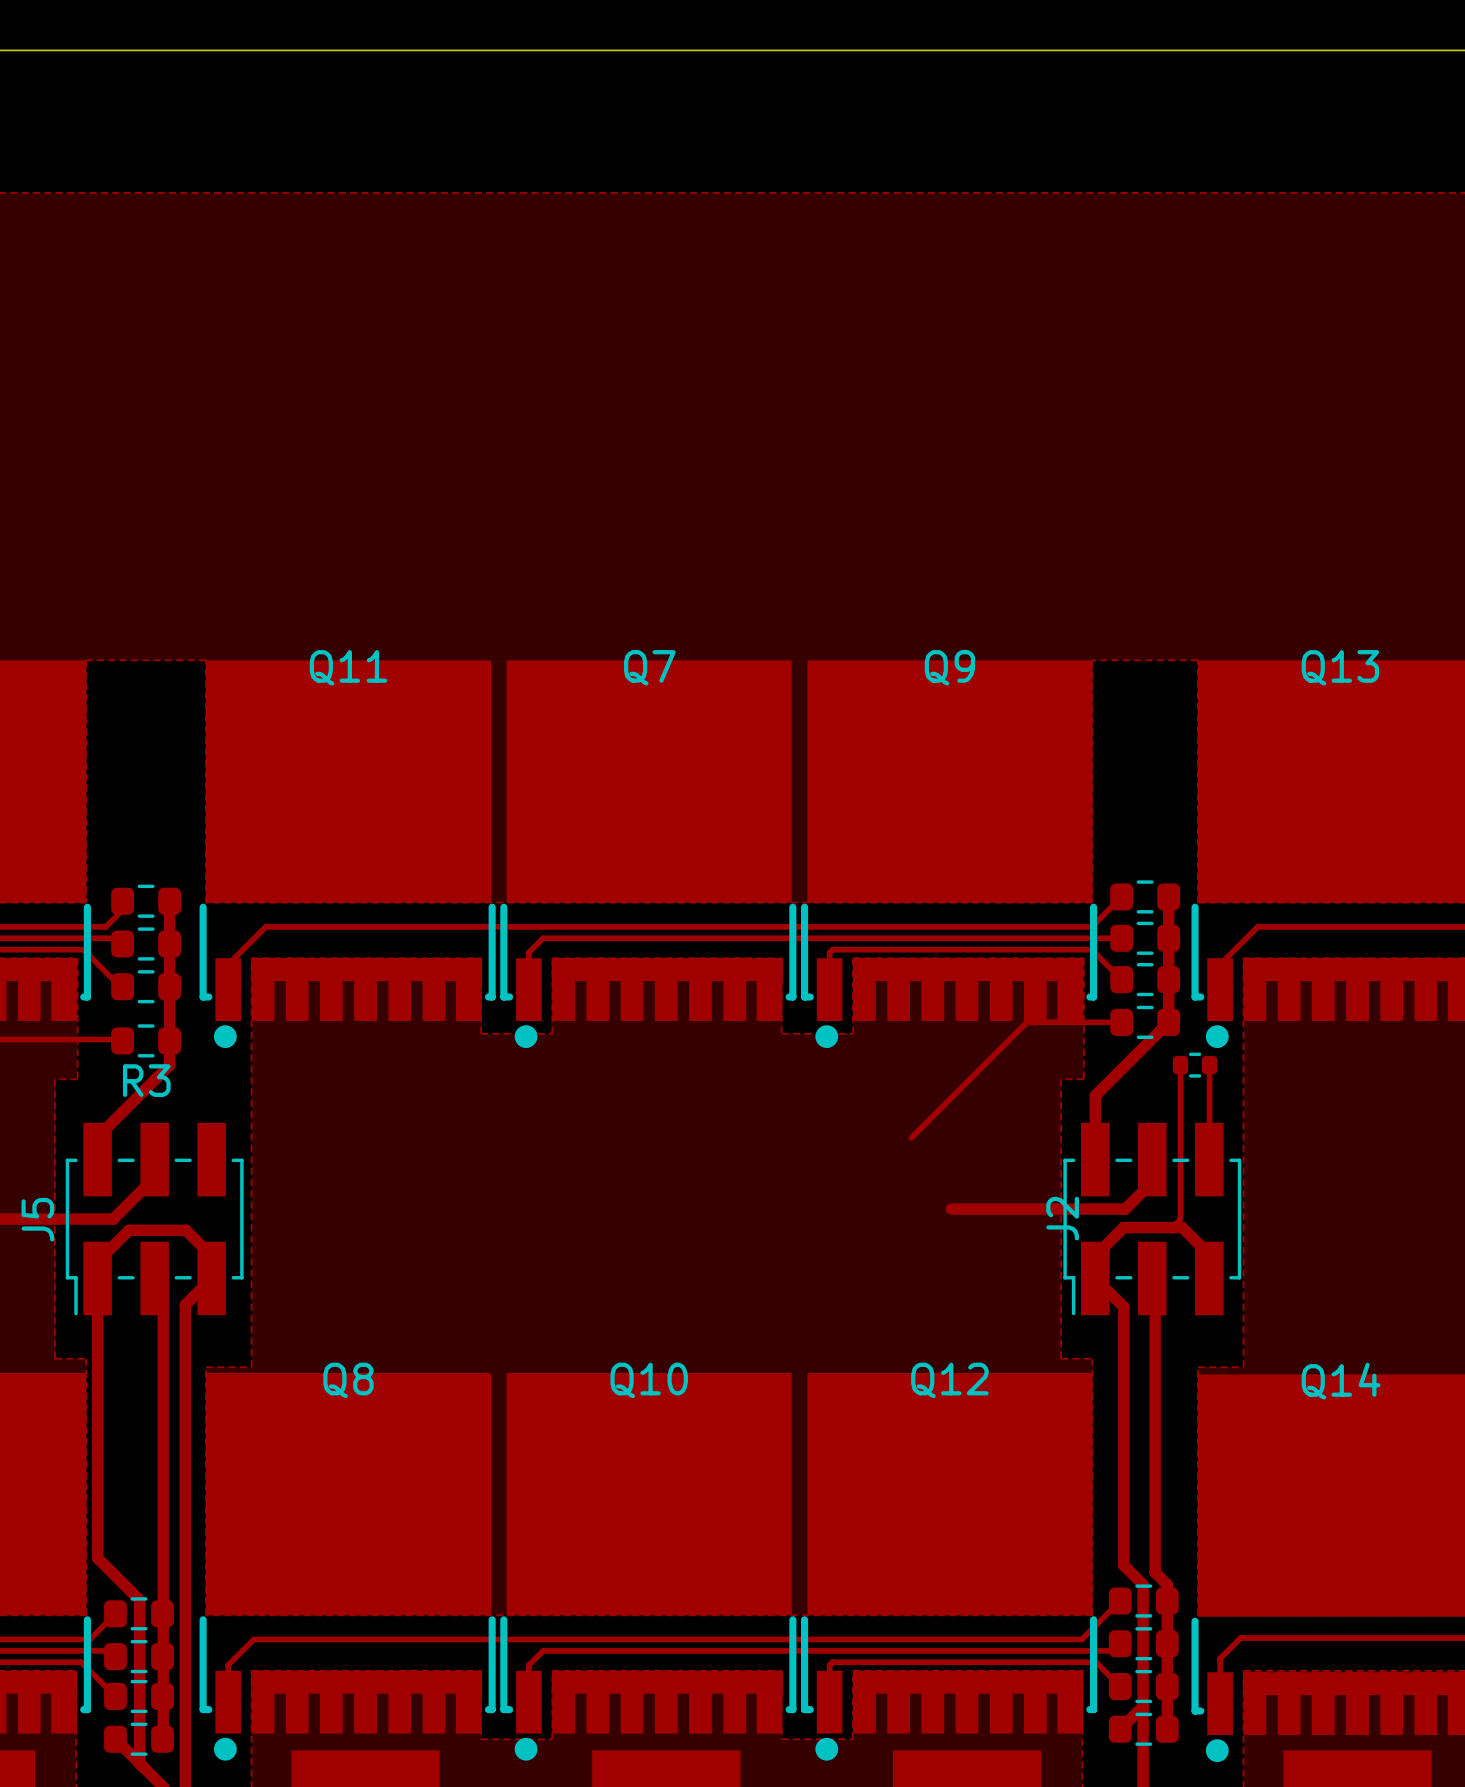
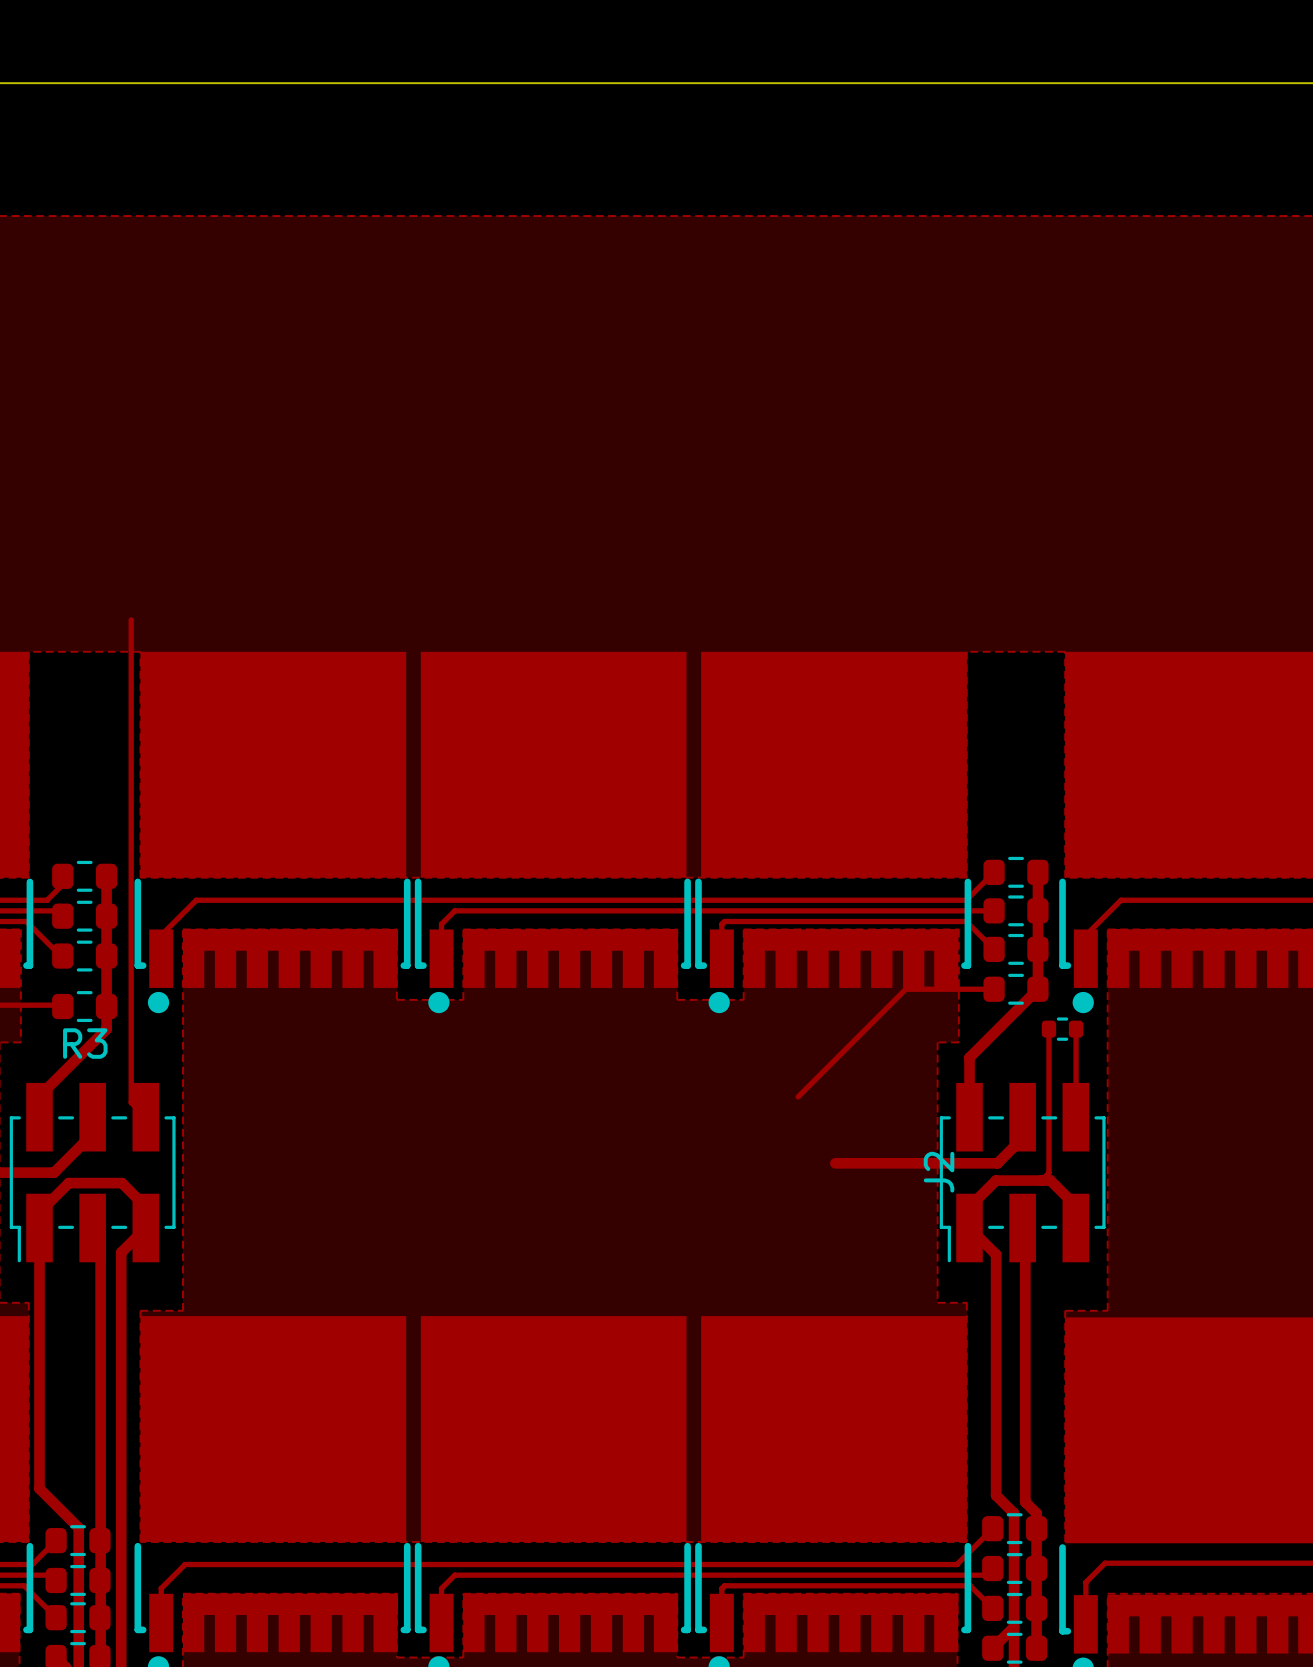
track: none -> (131, 619) (131, 1102) (145, 1117)
Q11 name: Q11 (348, 667) -> none
Q7 name: Q7 (649, 667) -> none
Q9 name: Q9 (949, 667) -> none
Q13 name: Q13 (1340, 667) -> none
Q8 name: Q8 (348, 1380) -> none
Q10 name: Q10 (649, 1380) -> none
Q12 name: Q12 (949, 1380) -> none
Q14 name: Q14 (1341, 1381) -> none

